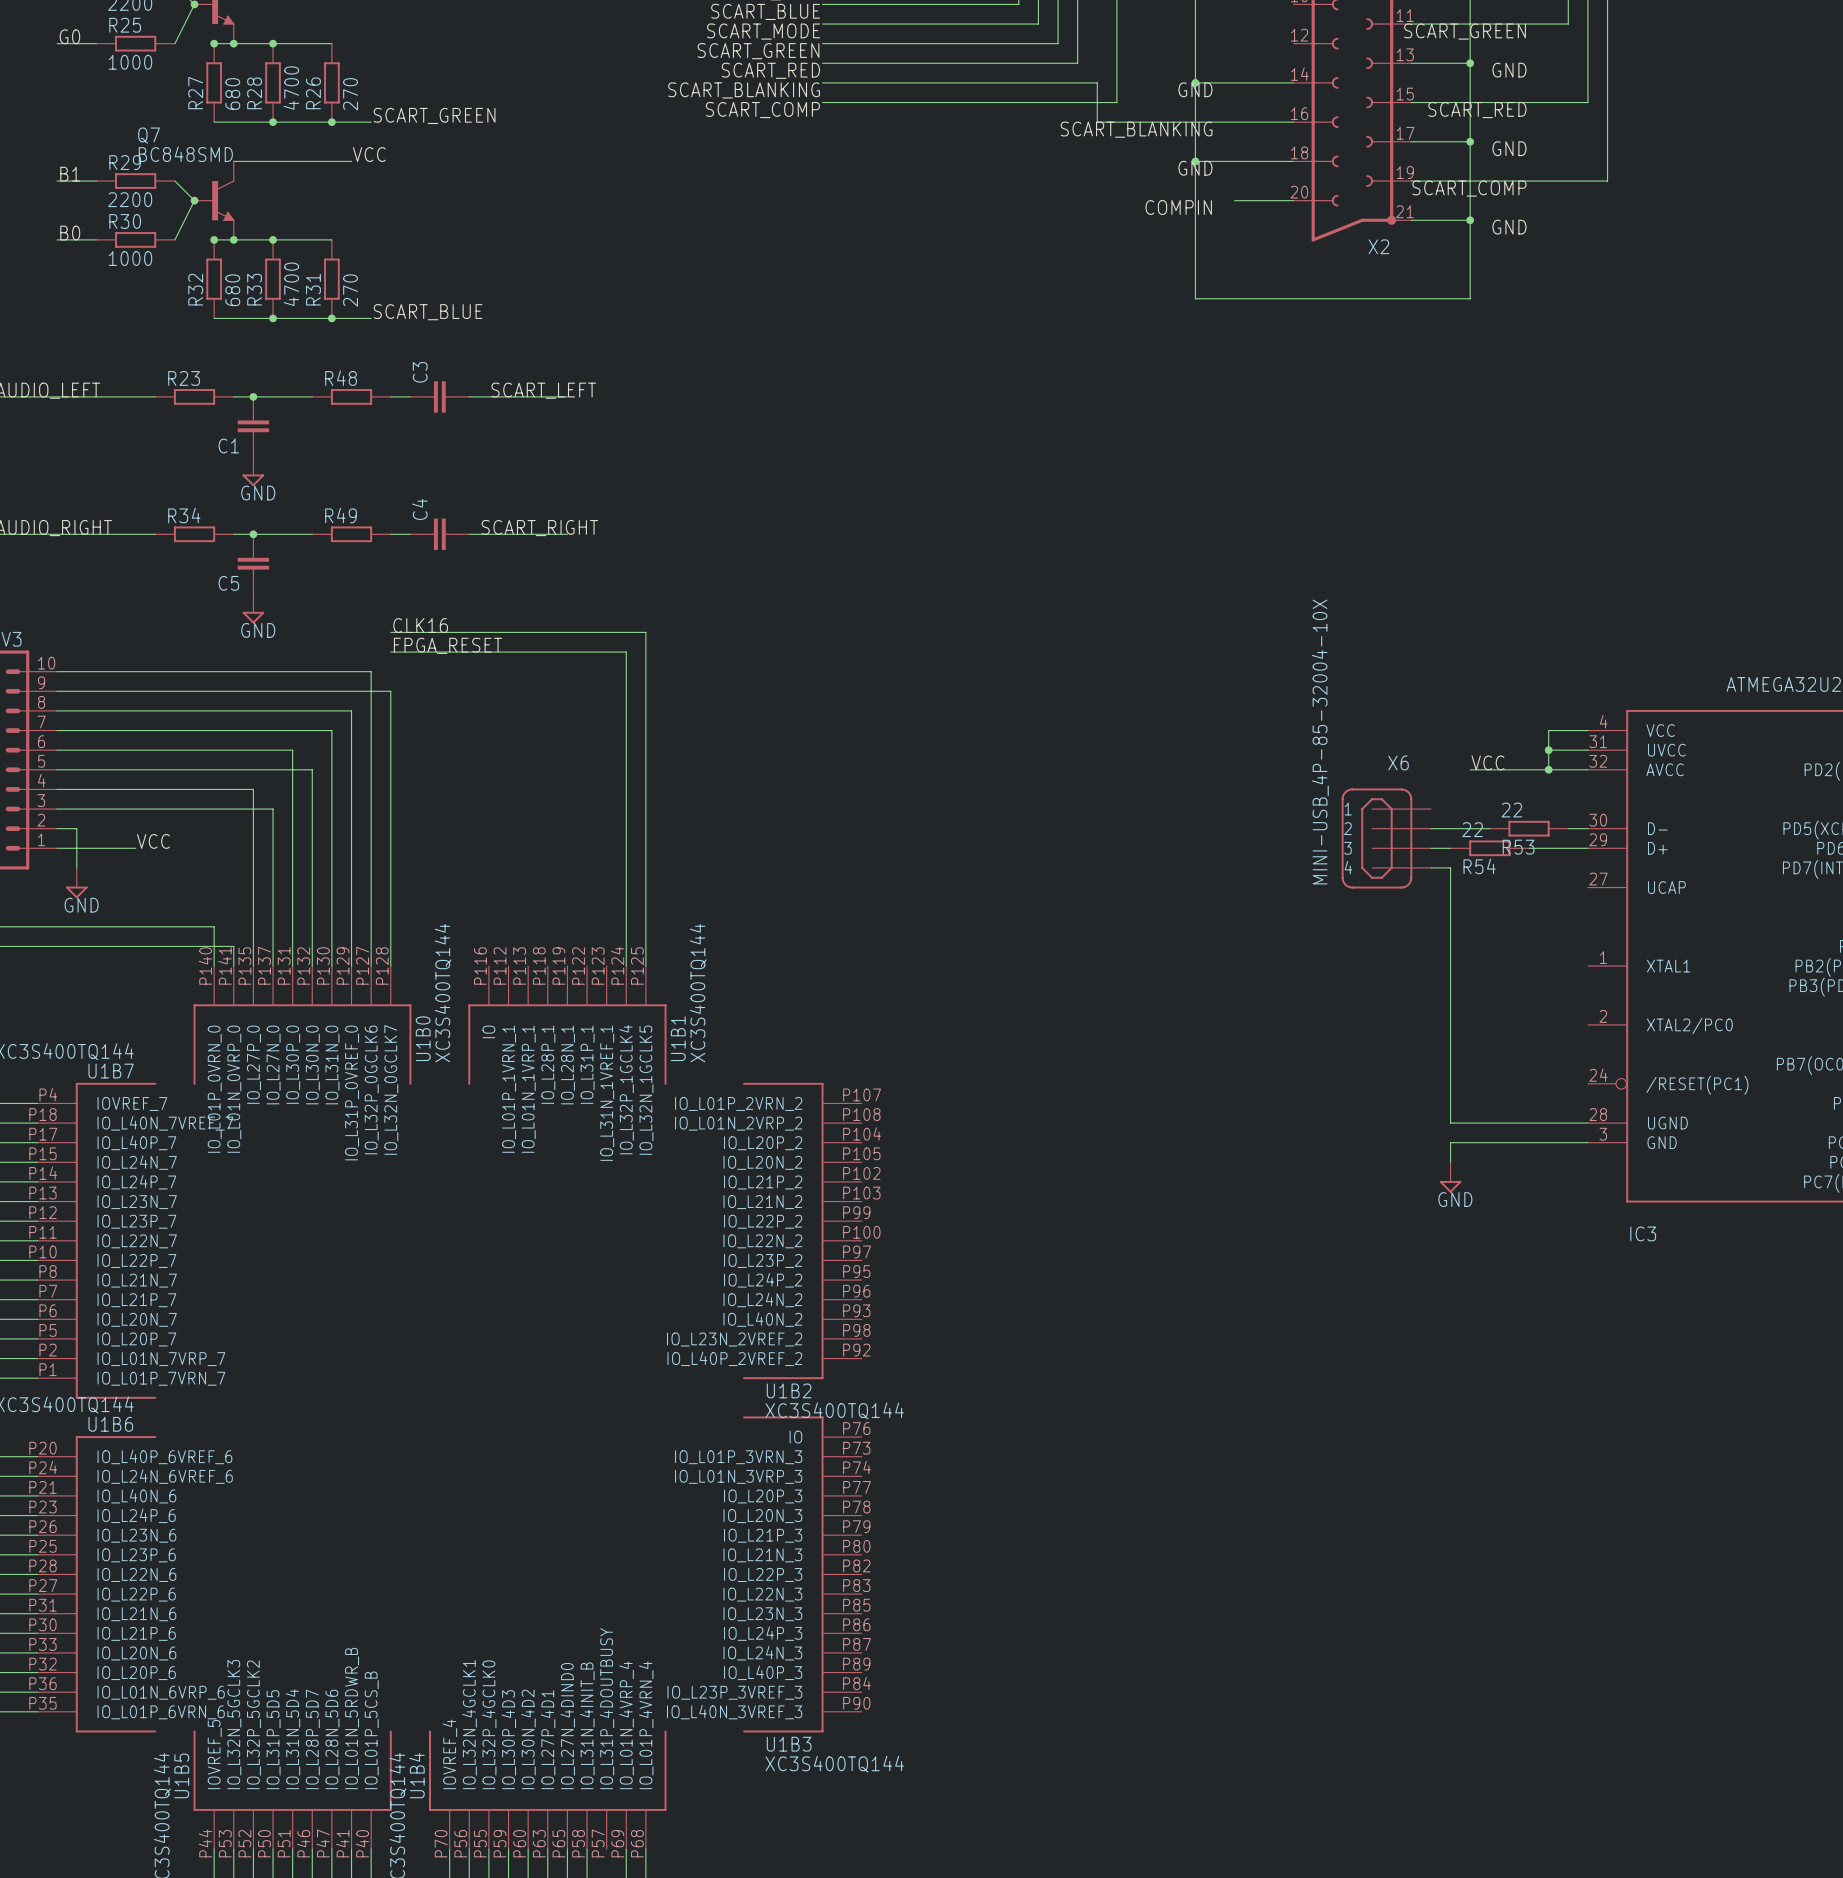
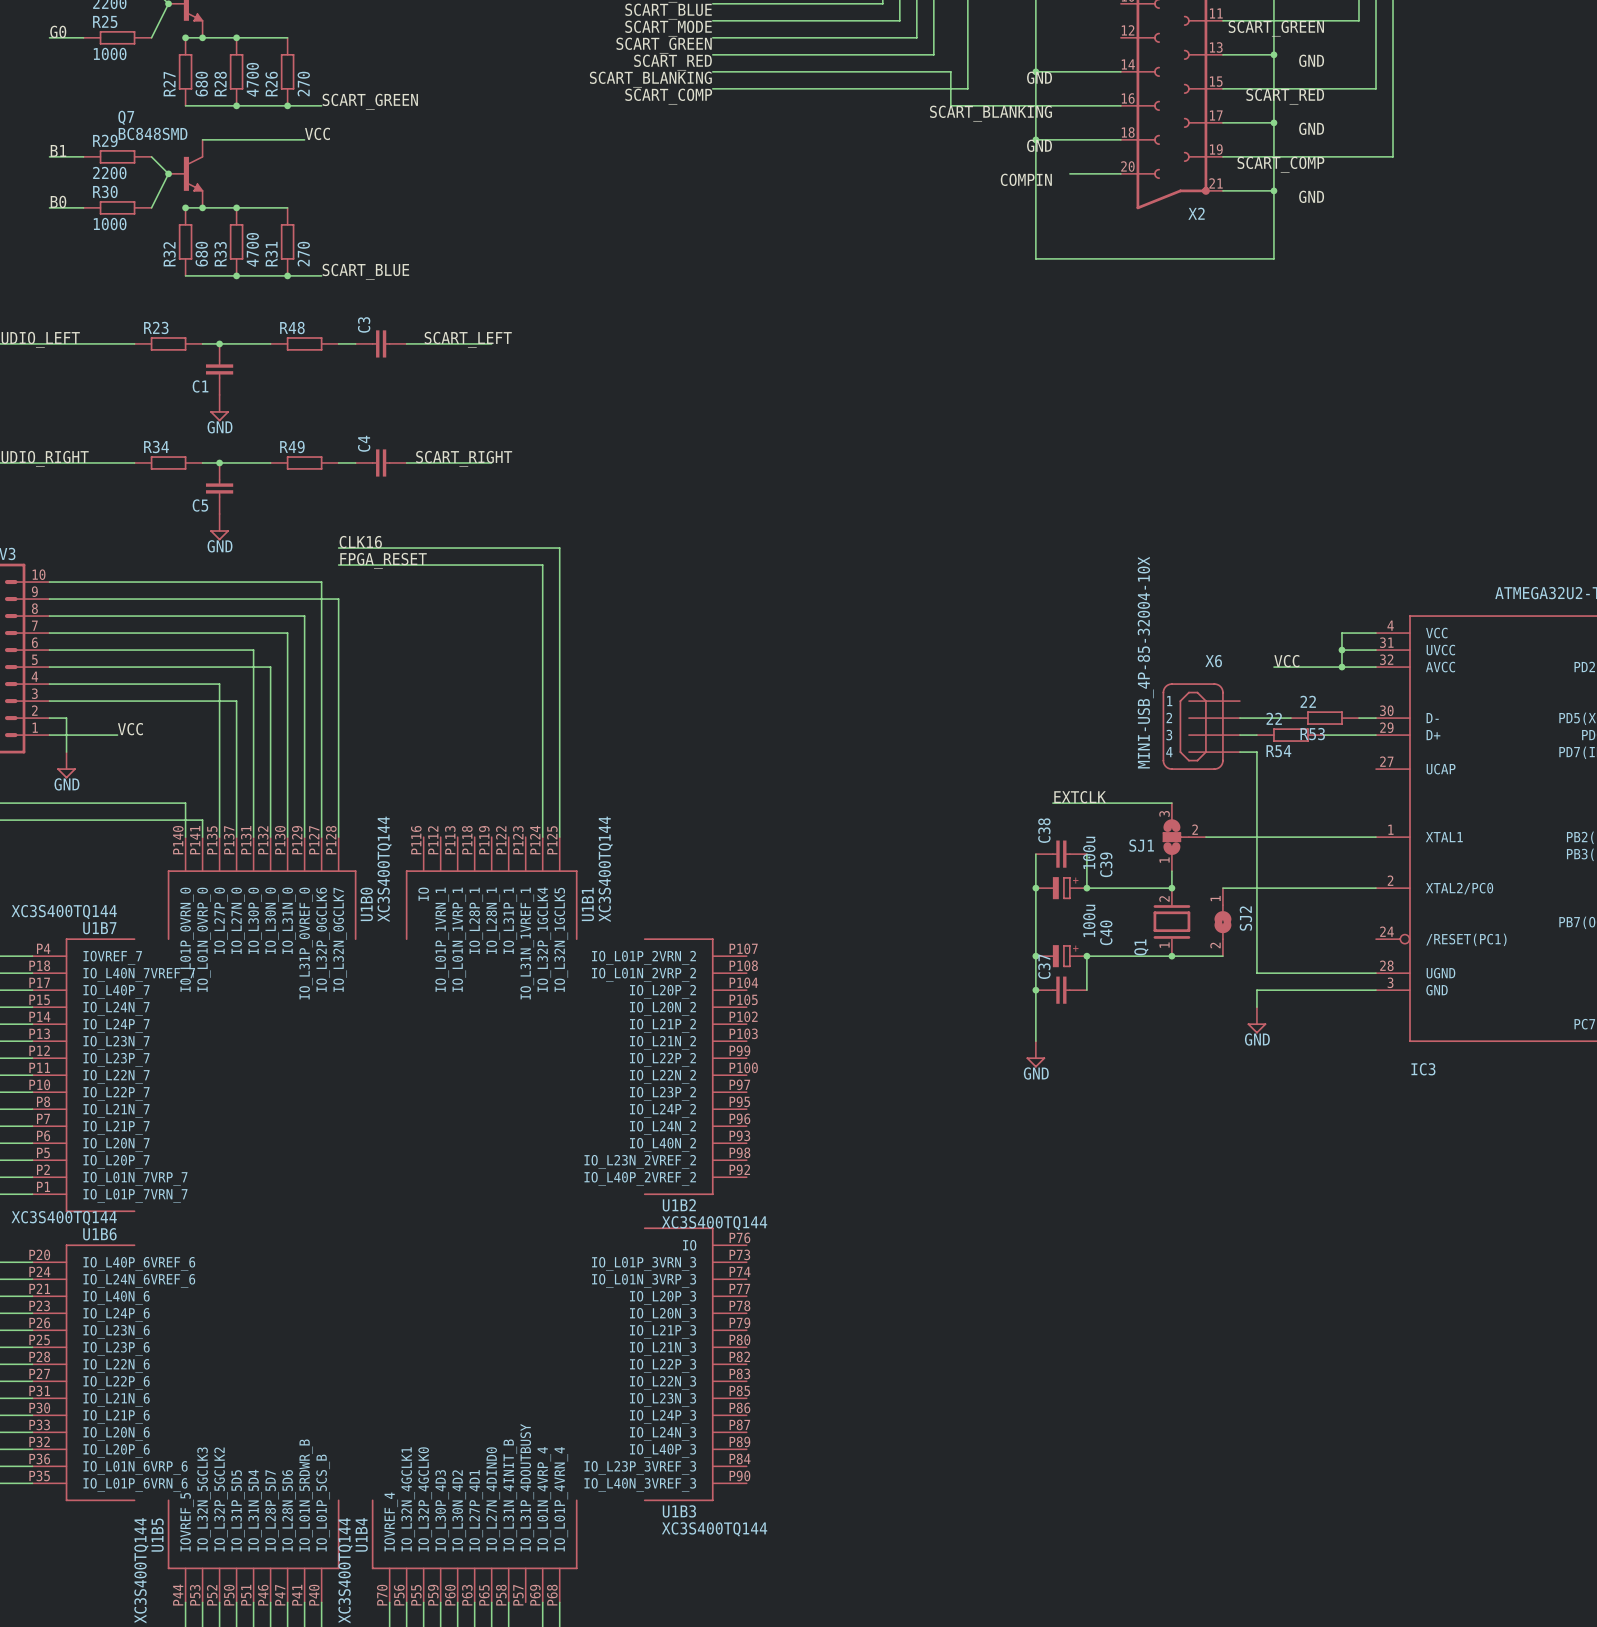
label: none -> EXTCLK (1080, 797)
wire: none -> (1052, 803) (1171, 803)
SJ1: none -> (1184, 837)
wire: none -> (1205, 837) (1375, 837)
wire: none -> (1035, 854) (1035, 1041)
C38: none -> (1061, 854)
wire: none -> (1086, 854) (1086, 888) (1171, 888) (1171, 871)
junction: none -> (1035, 888)
C39: none -> 100u (1061, 888)
junction: none -> (1086, 888)
junction: none -> (1171, 888)
wire: none -> (1222, 888) (1375, 888)
Q1: none -> (1171, 922)
SJ2: none -> (1222, 922)
junction: none -> (1035, 956)
C40: none -> 100u (1061, 956)
junction: none -> (1086, 956)
junction: none -> (1171, 956)
wire: none -> (1222, 956) (1086, 956) (1086, 990)
junction: none -> (1035, 990)
C37: none -> (1061, 990)
power symbol: none -> GND (1035, 1054)

